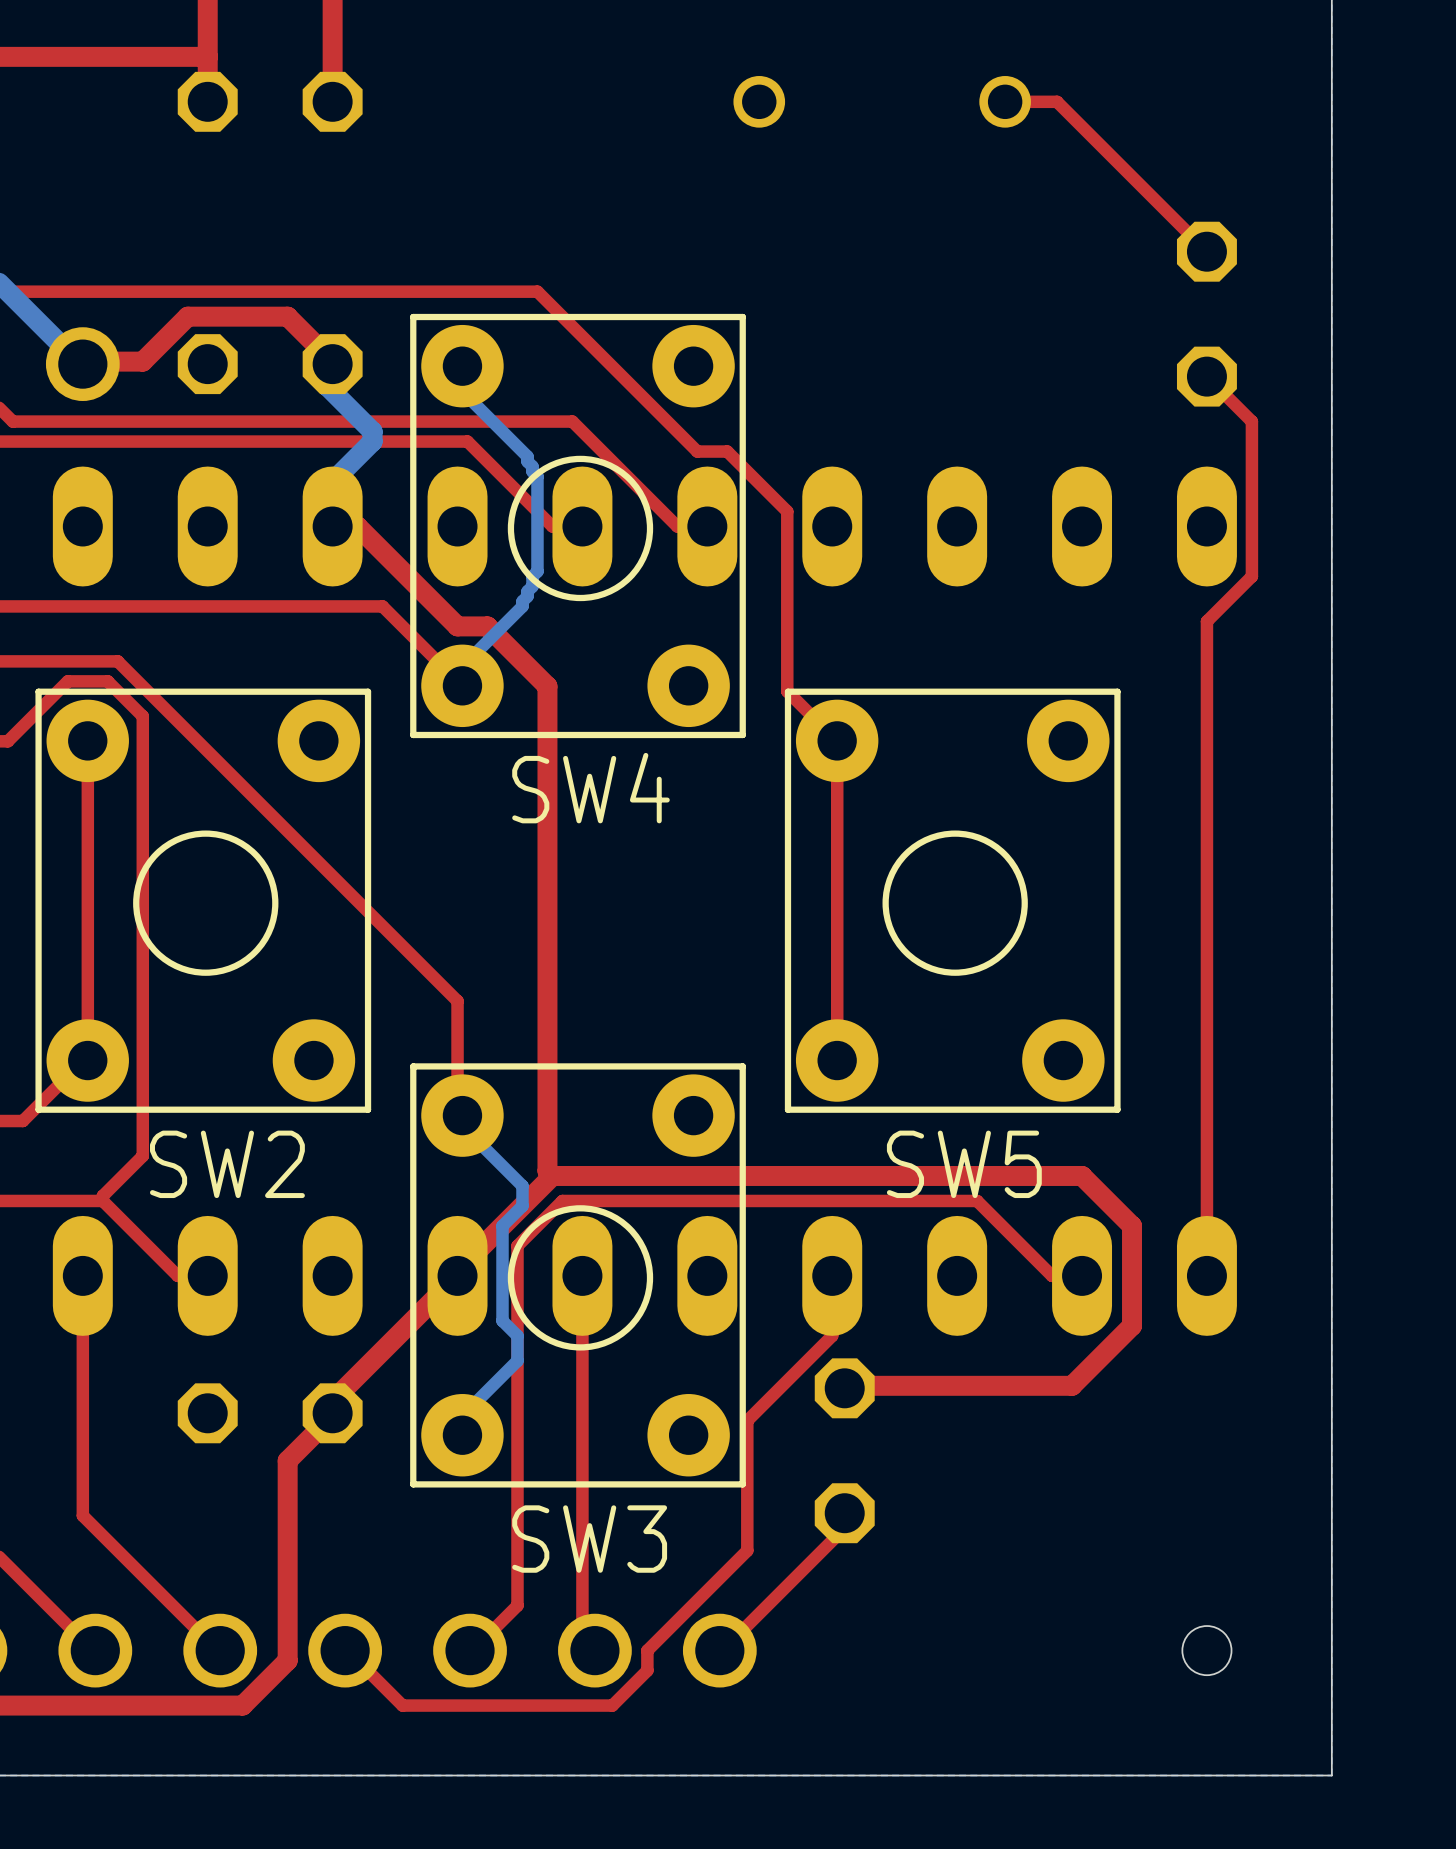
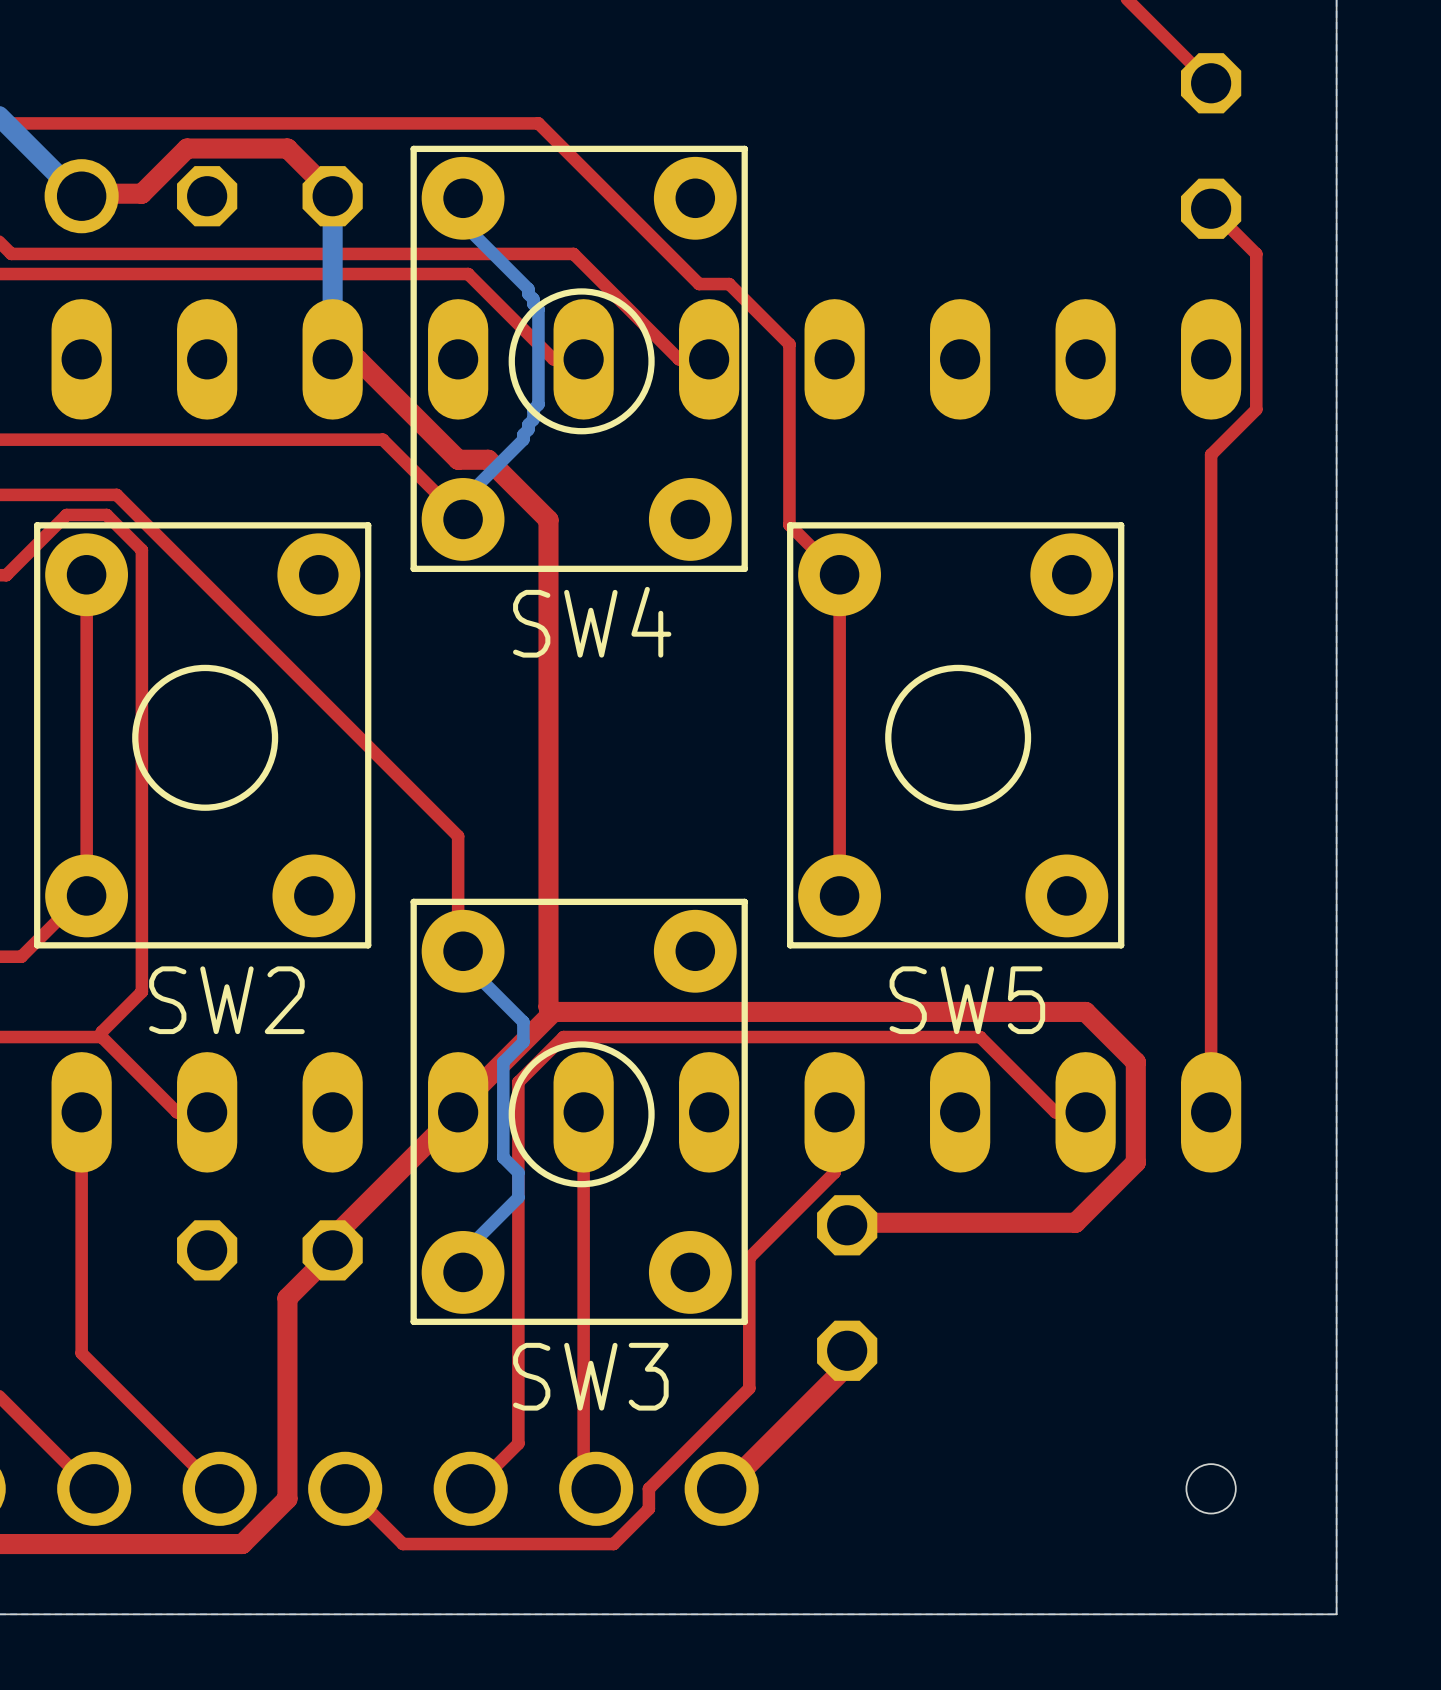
bottom track: (332, 366) (327, 371) (327, 386) (372, 431) (372, 441) (332, 481) -> (332, 198) (332, 314)
top track width: thin (842, 1530) (722, 1650) -> thick (844, 1368) (724, 1488)

